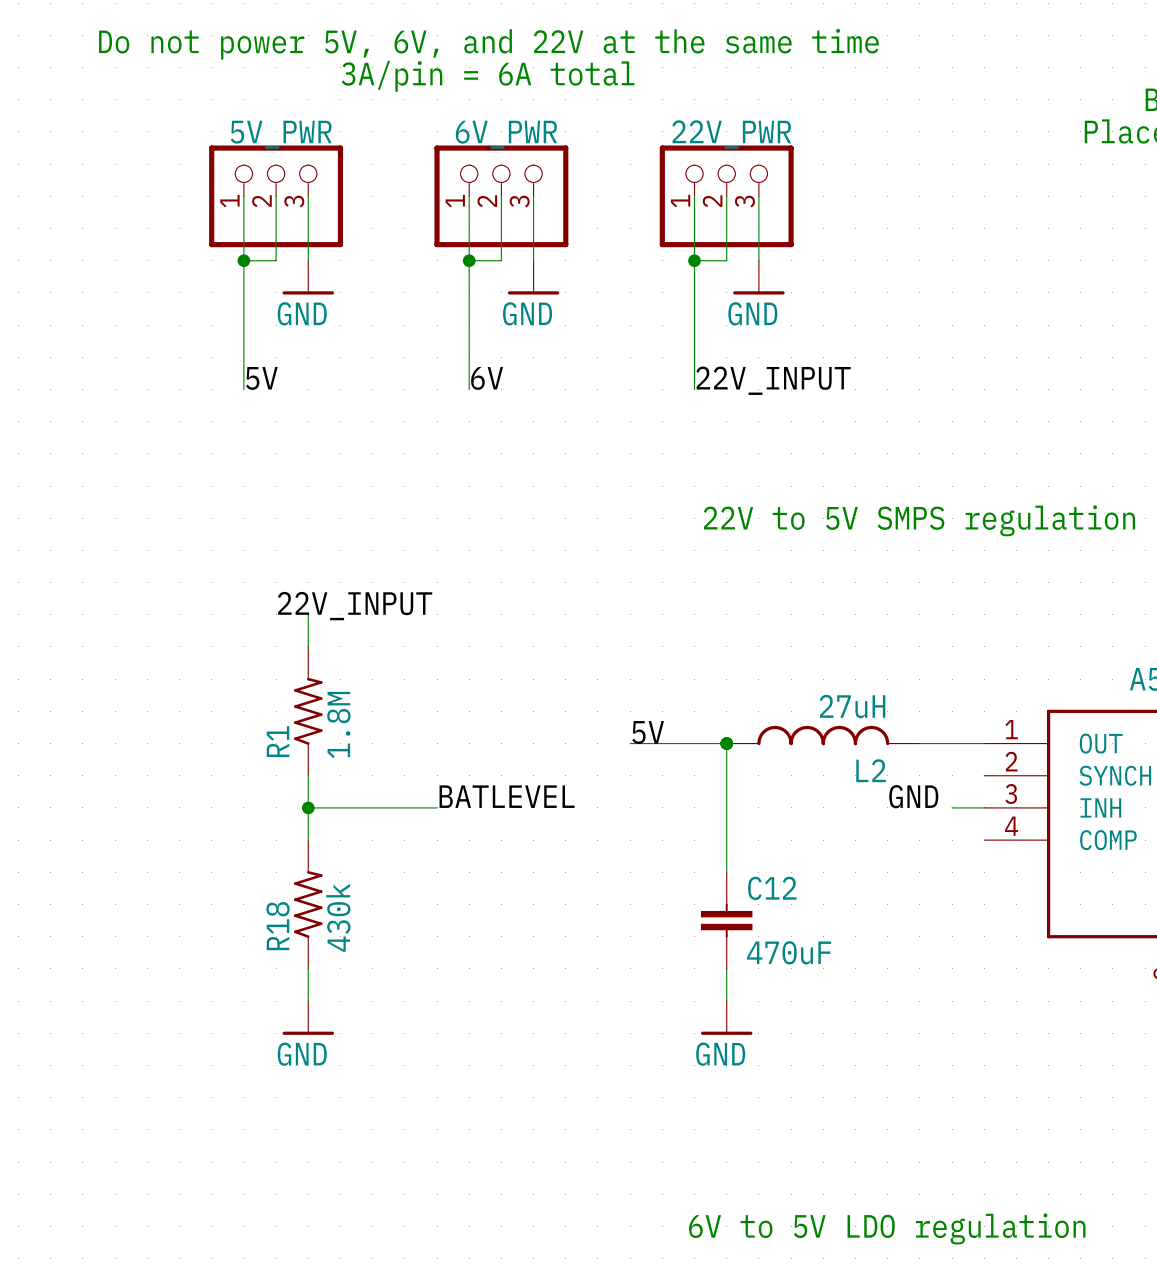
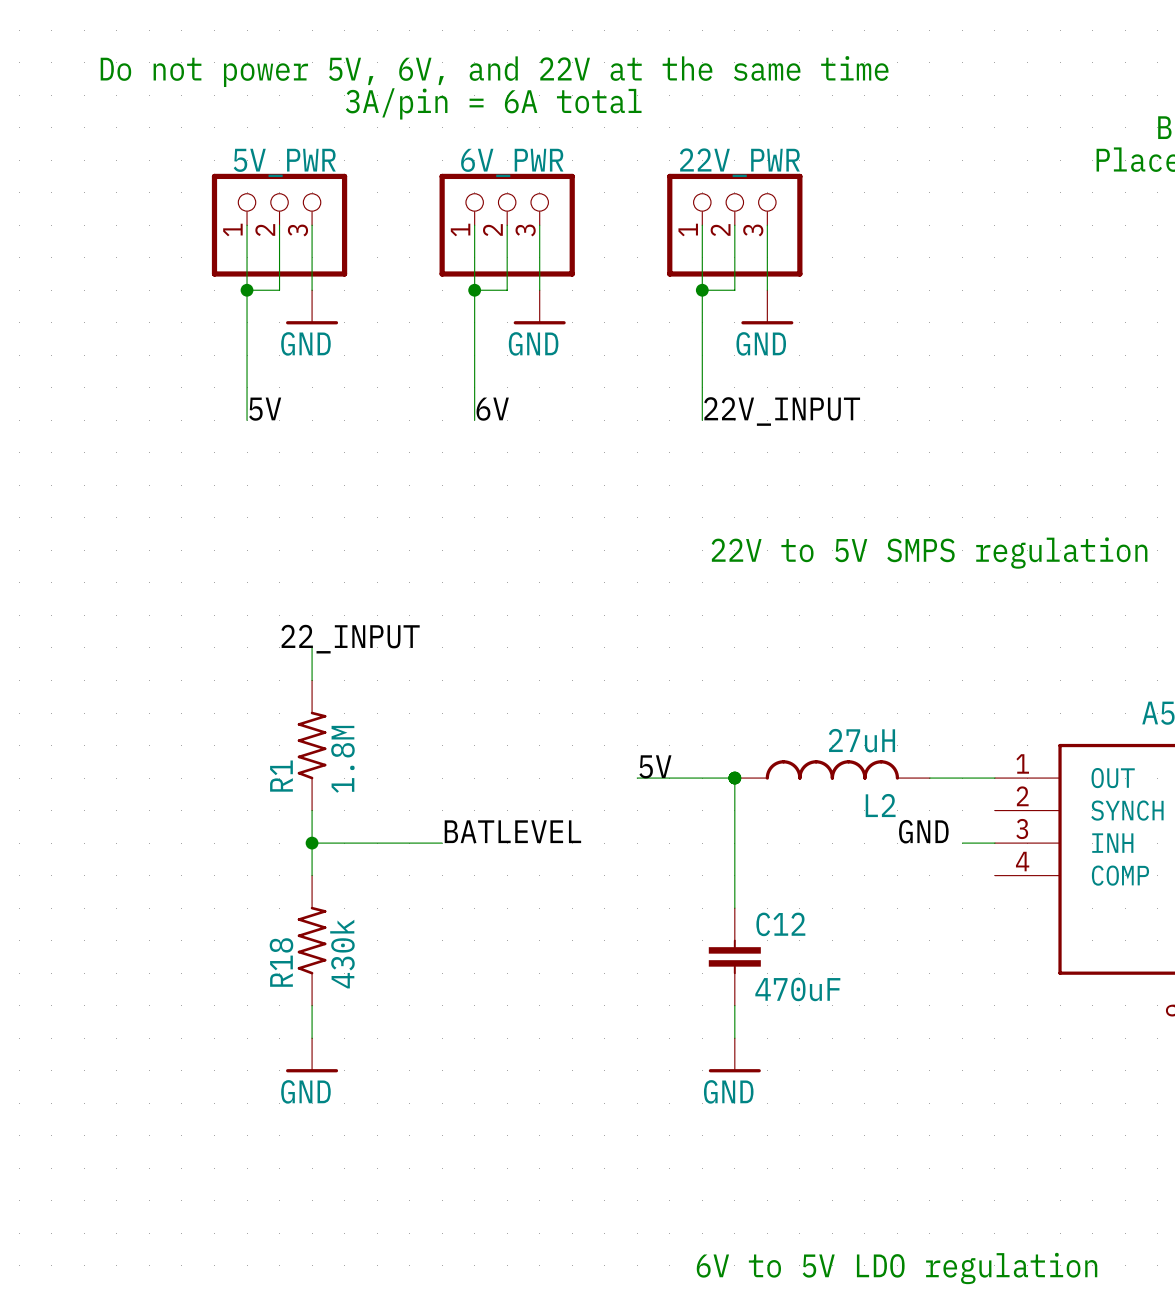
label: 22V_INPUT (355, 606) -> 22_INPUT (350, 639)

